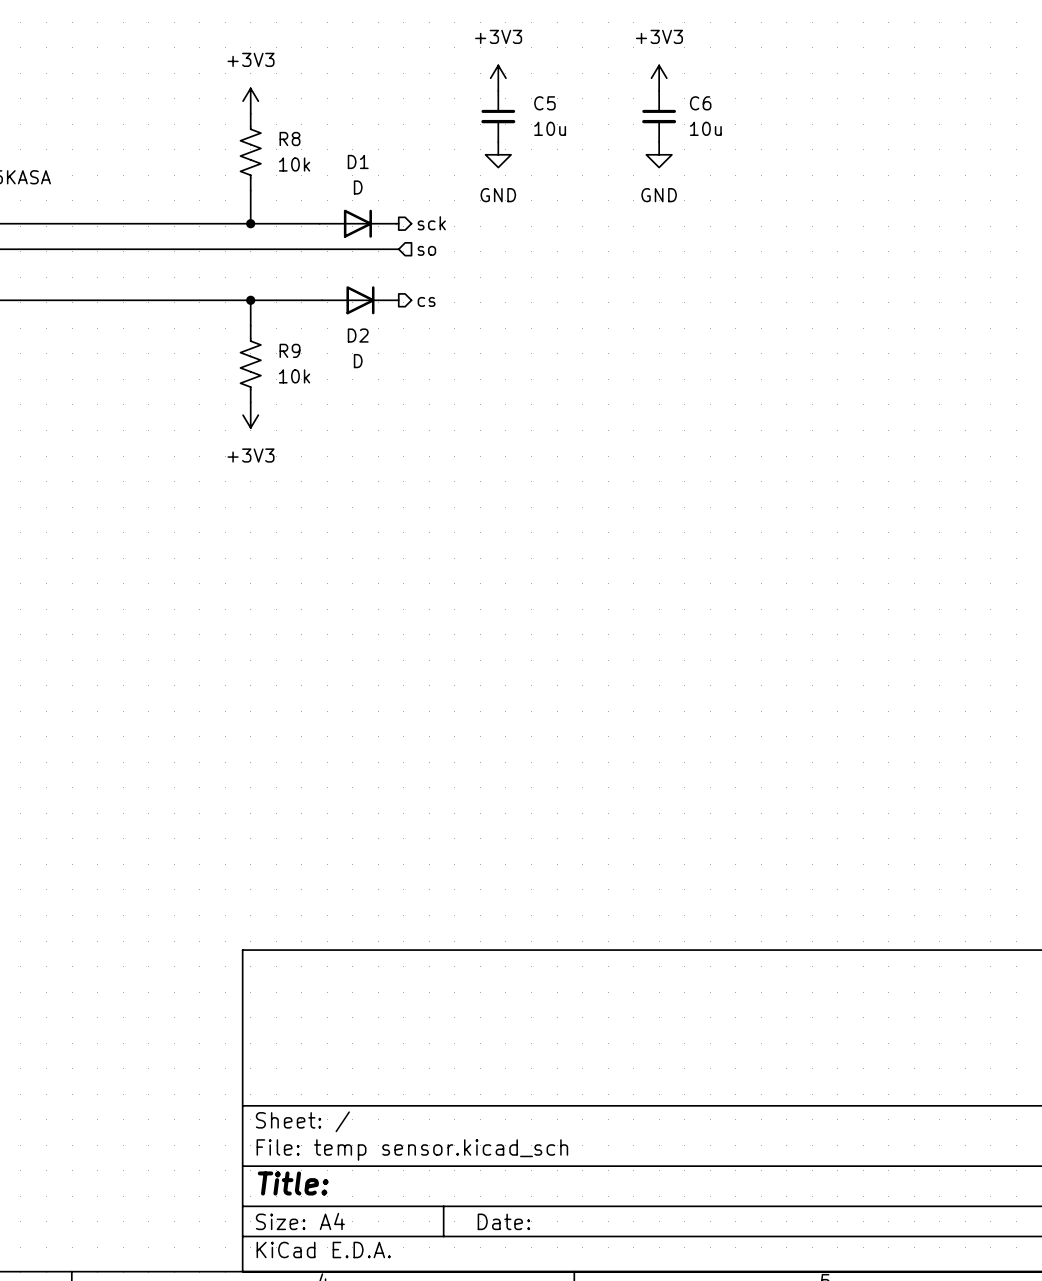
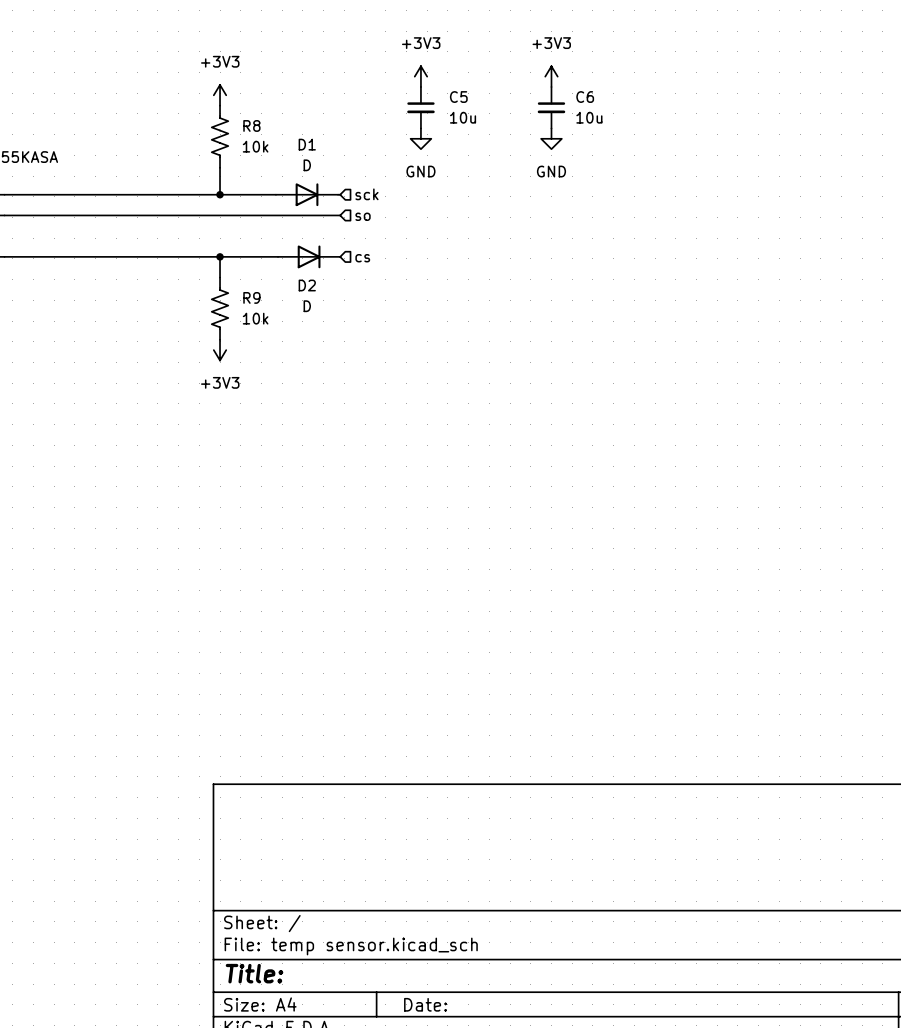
hierarchical label shape: output (431, 223) -> input (366, 194)
hierarchical label shape: output (426, 301) -> input (362, 258)

